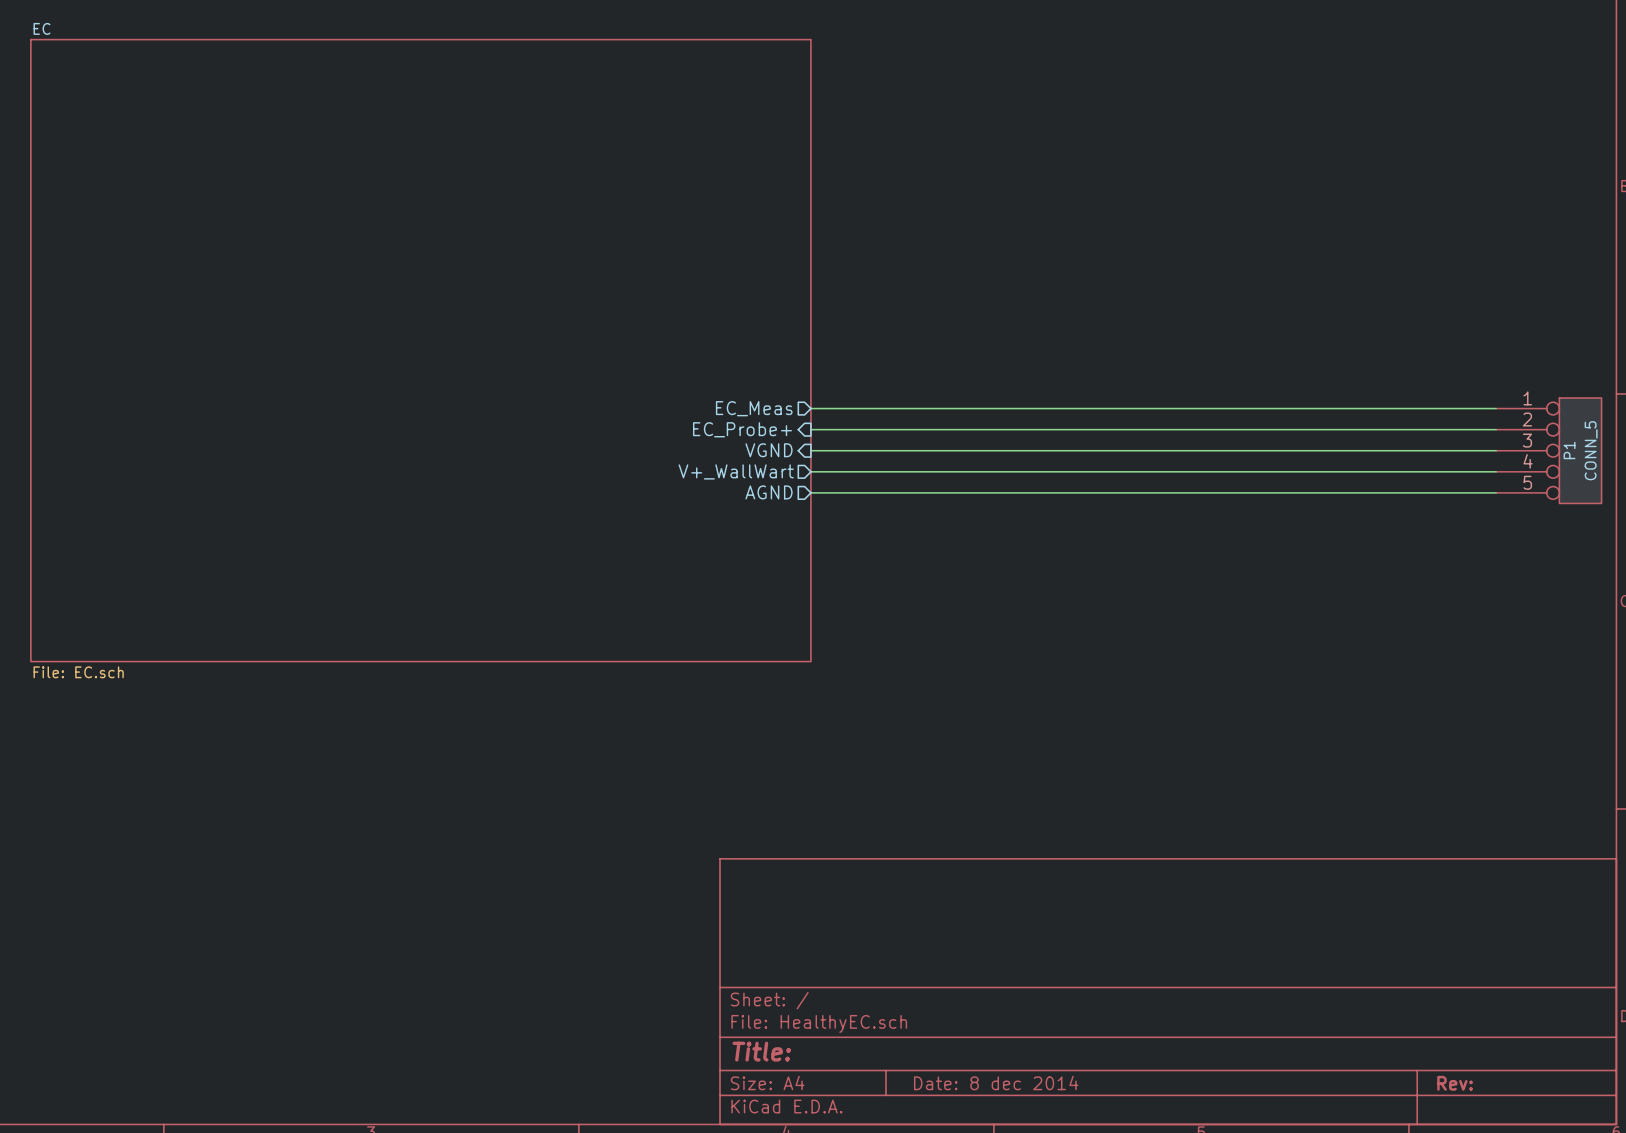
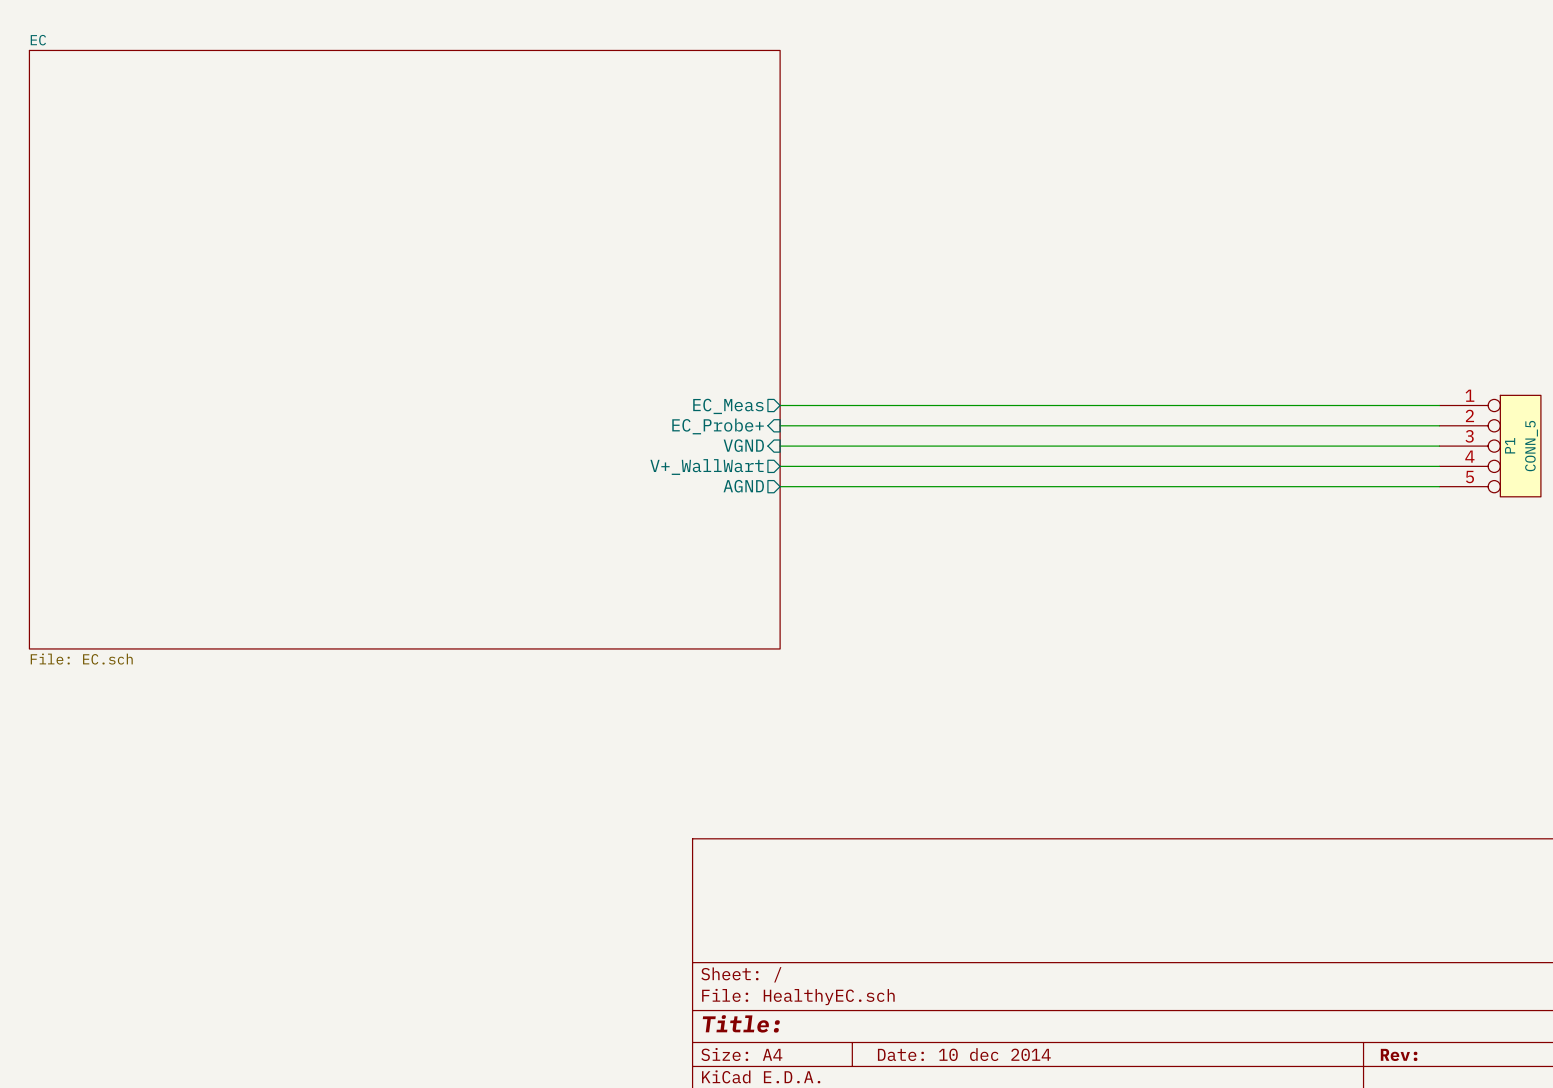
title block: Date: 8 dec 2014 (996, 1083) -> Date: 10 dec 2014 (964, 1054)

